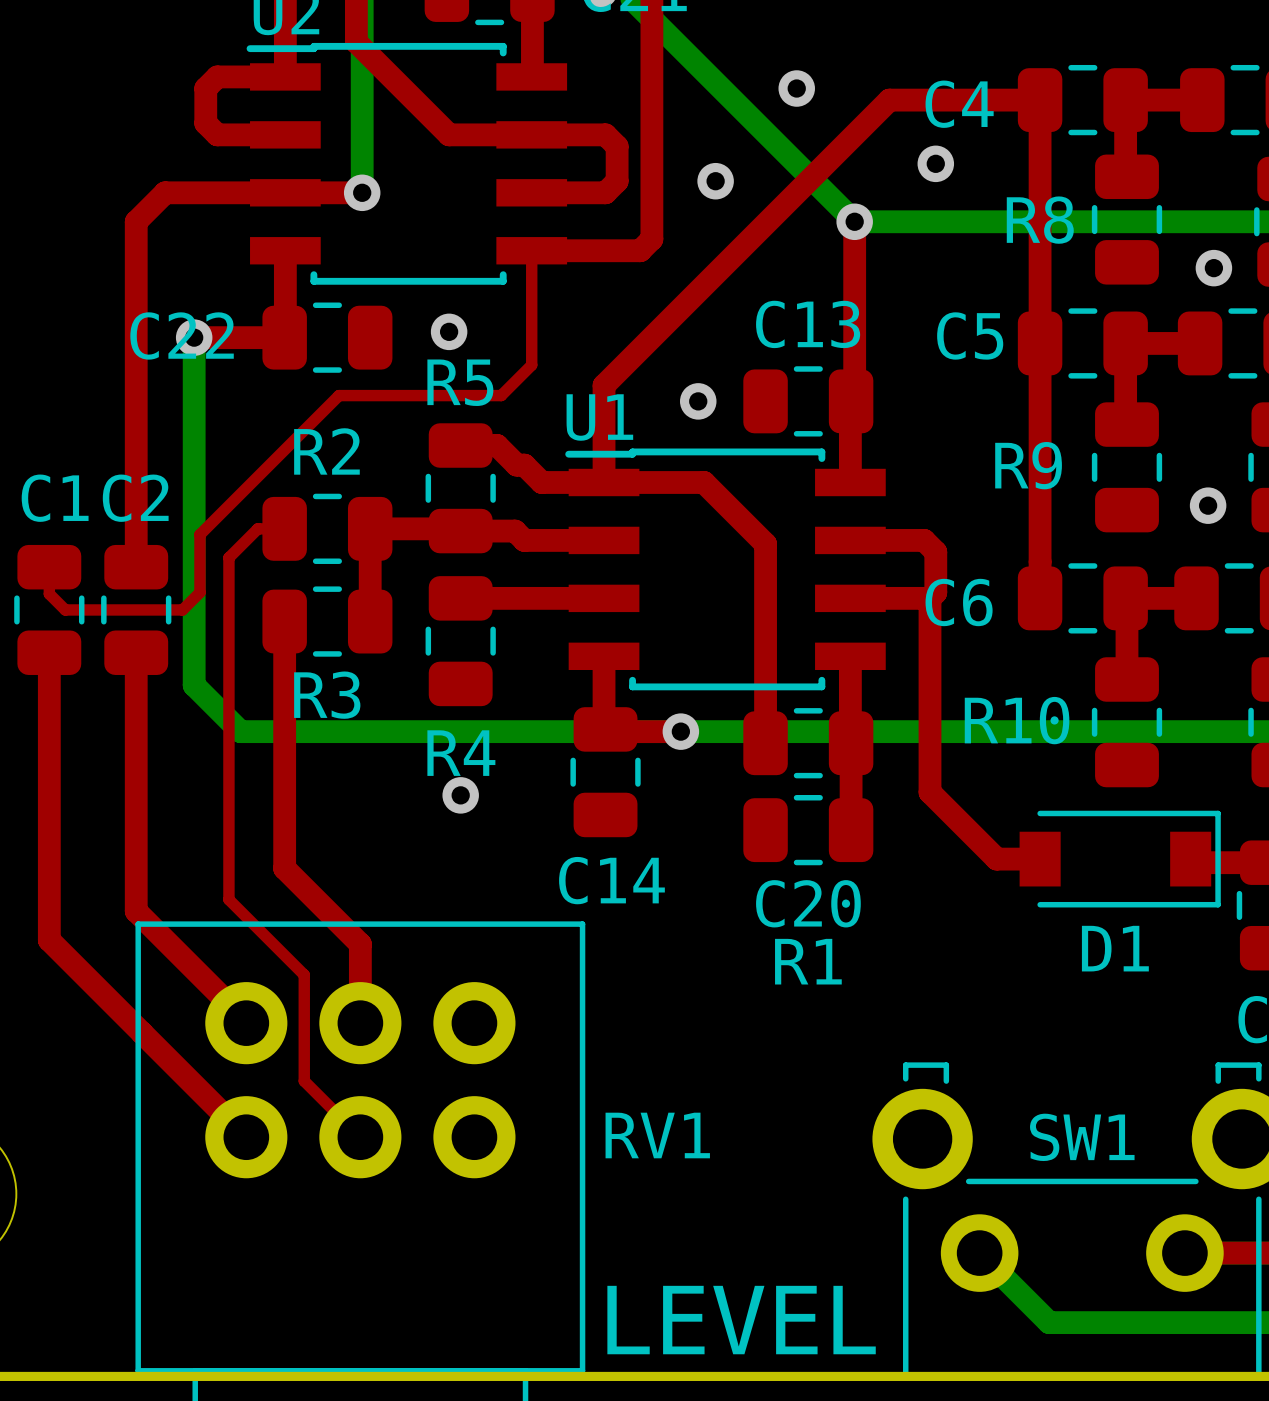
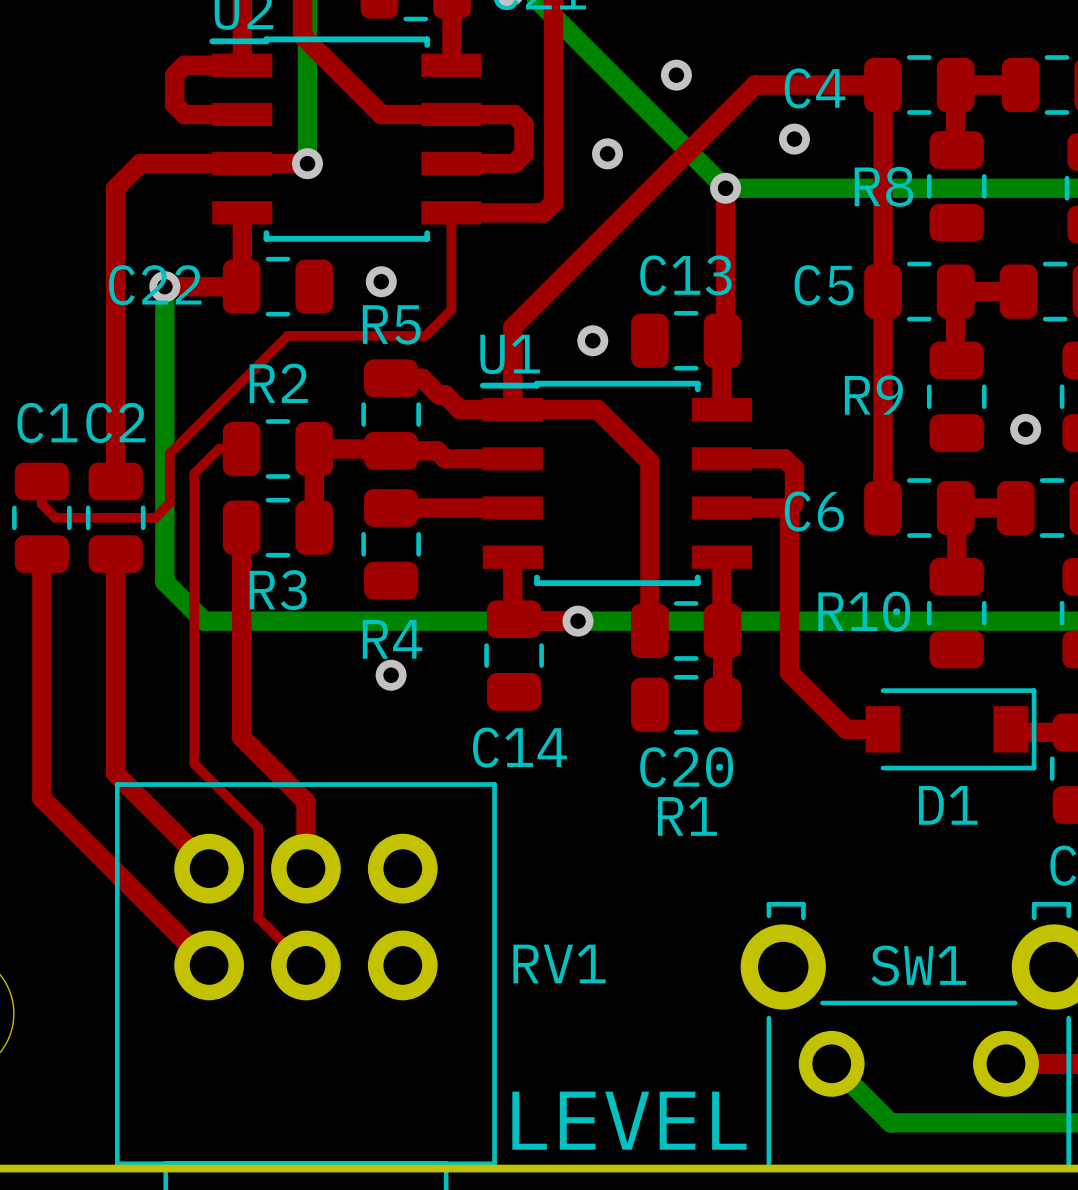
via: (1213, 268) -> none

